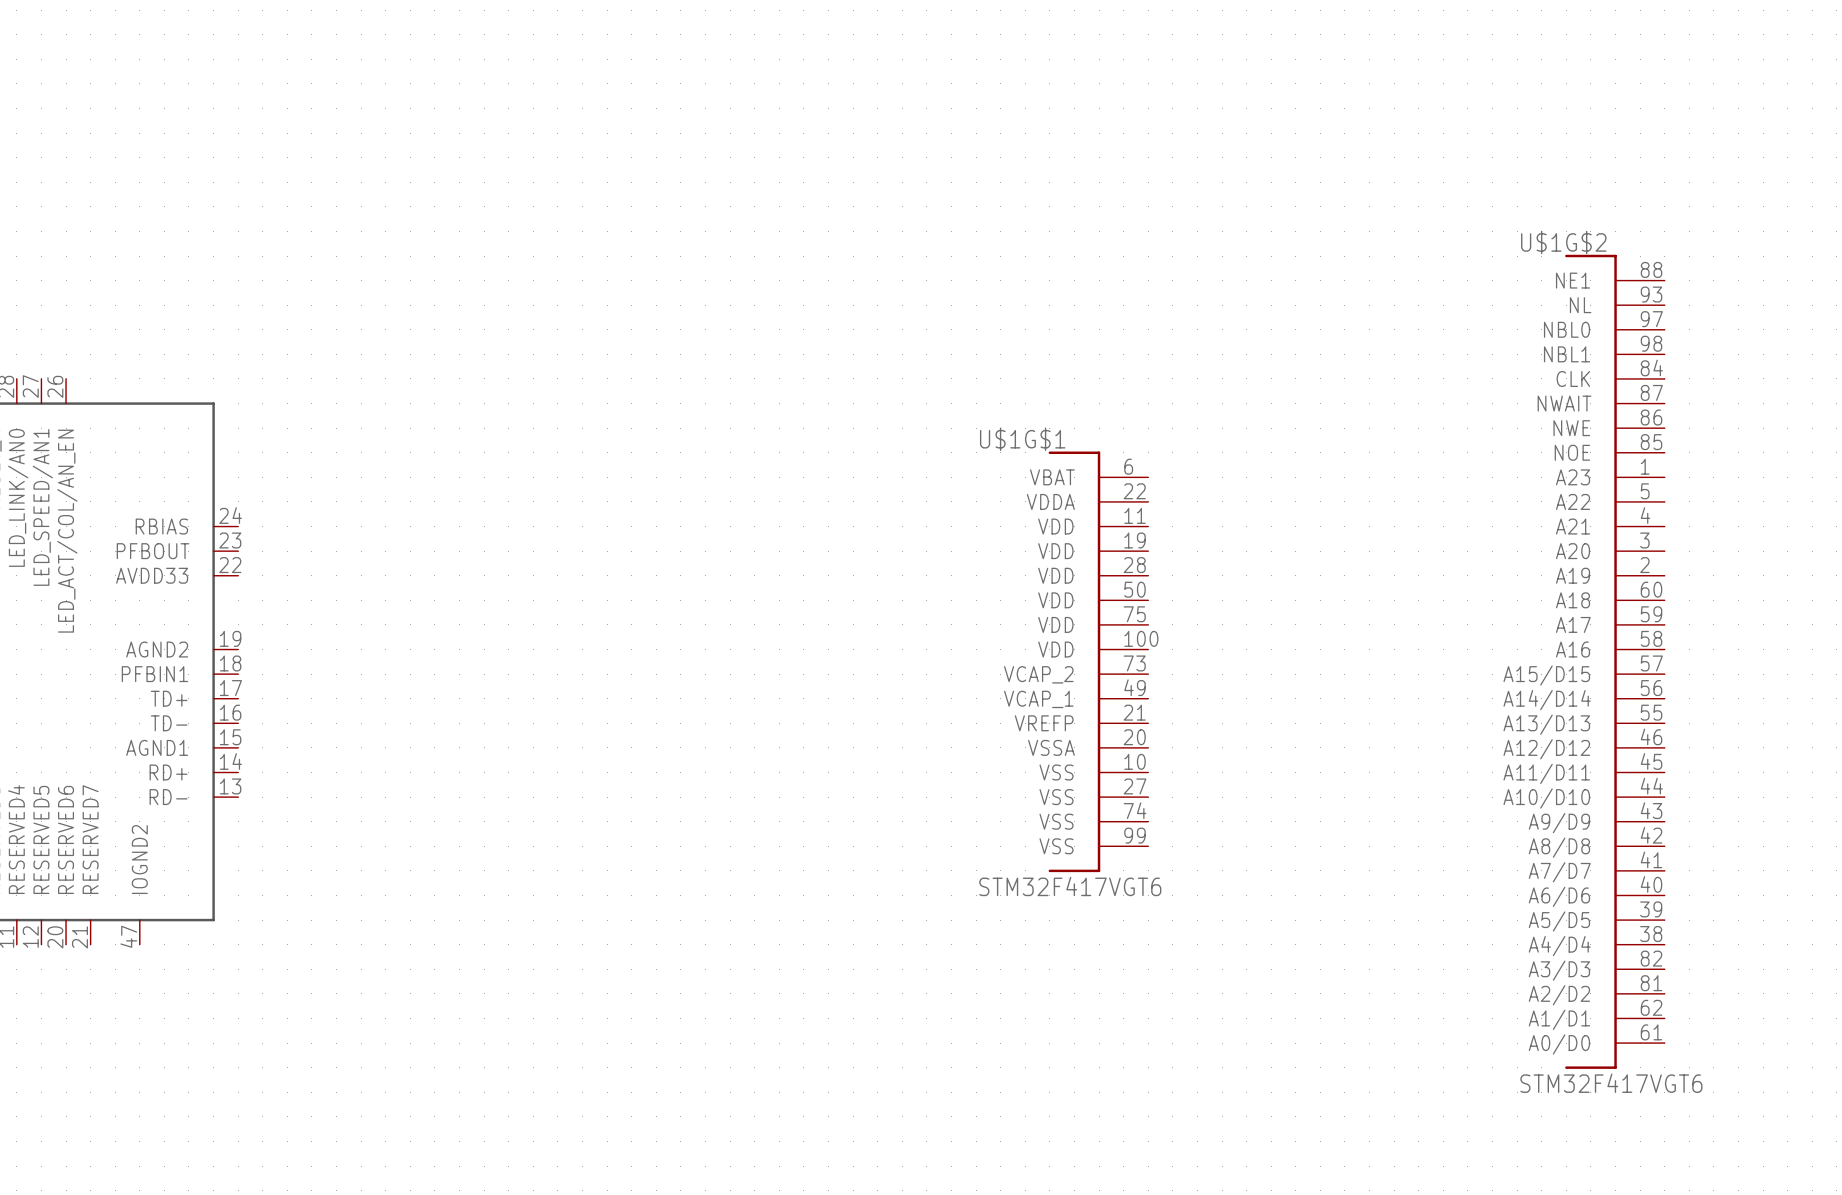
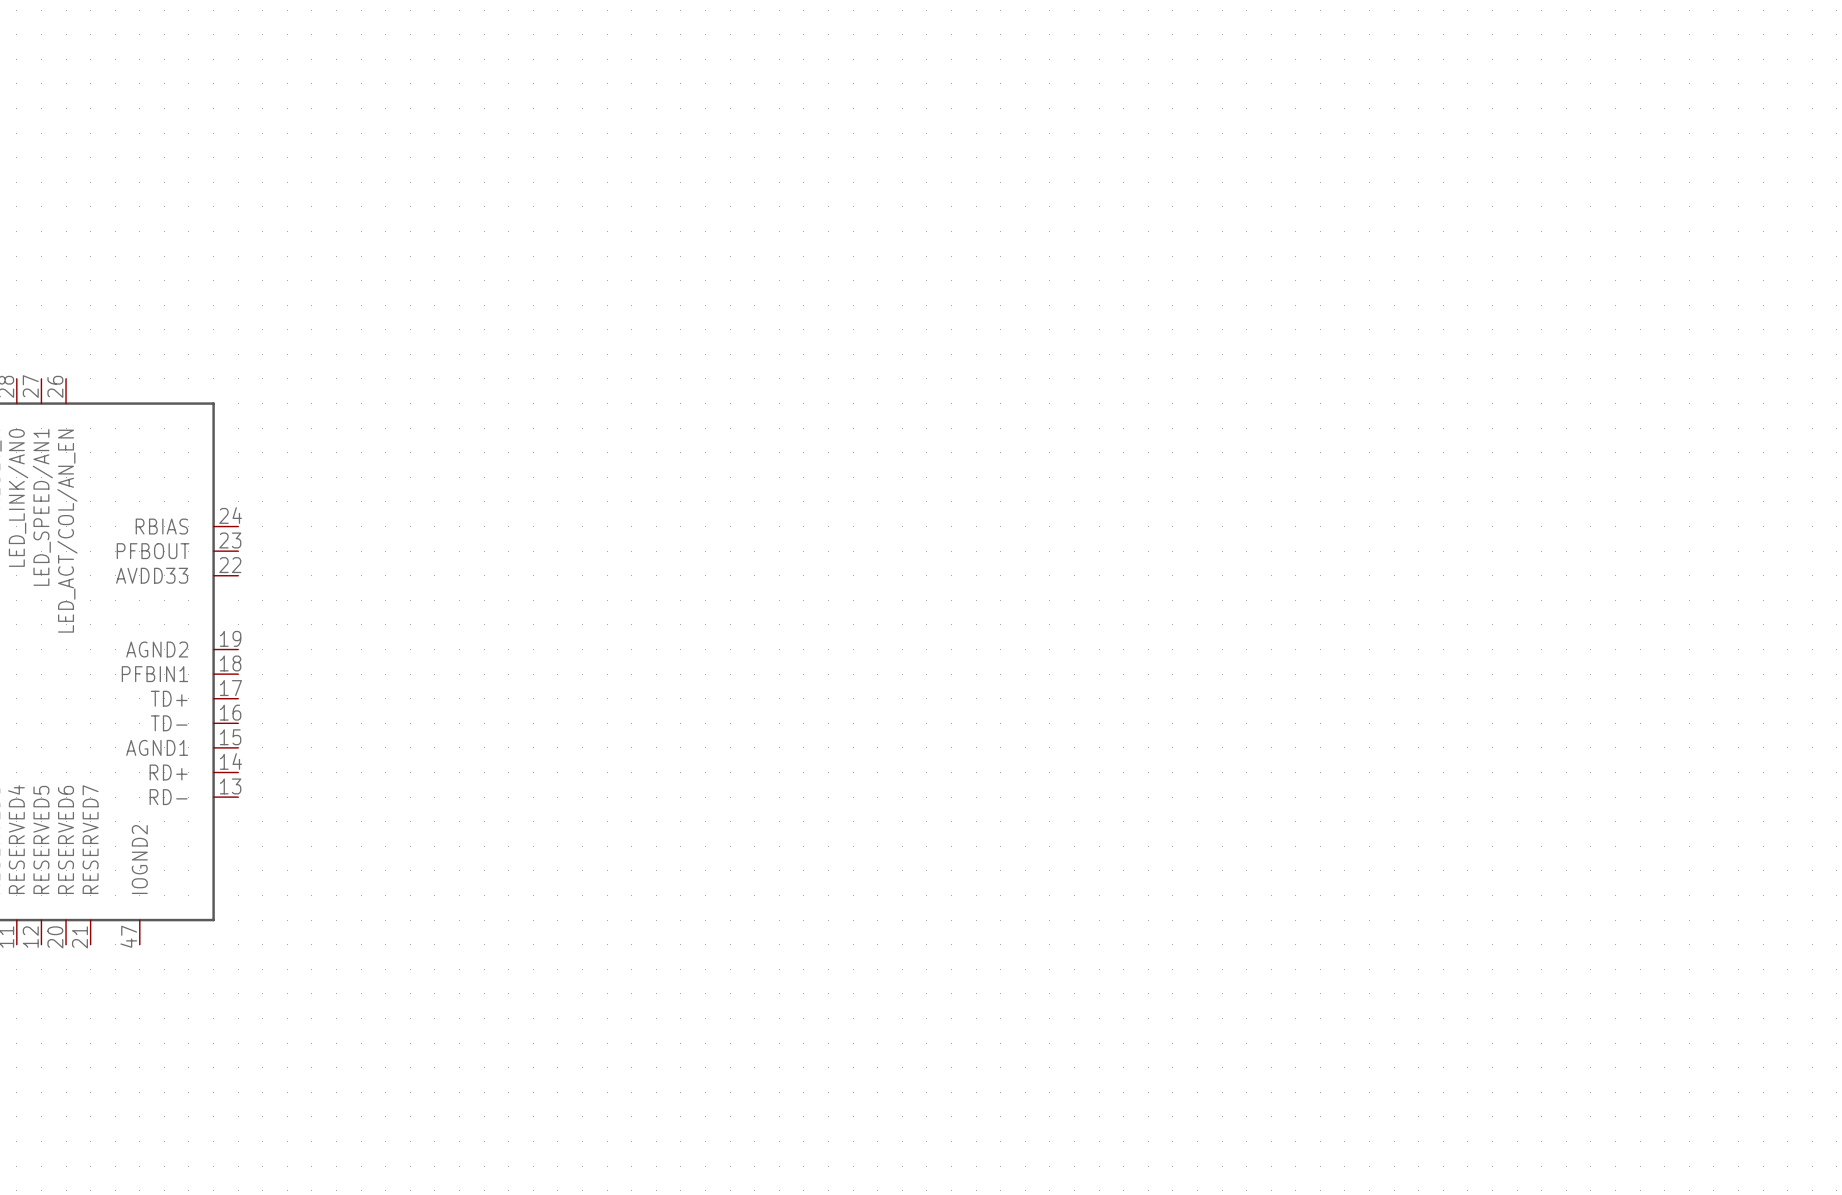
U$1G$1: STM32F417VGT6 (1098, 661) -> none
U$1G$2: STM32F417VGT6 (1614, 661) -> none

